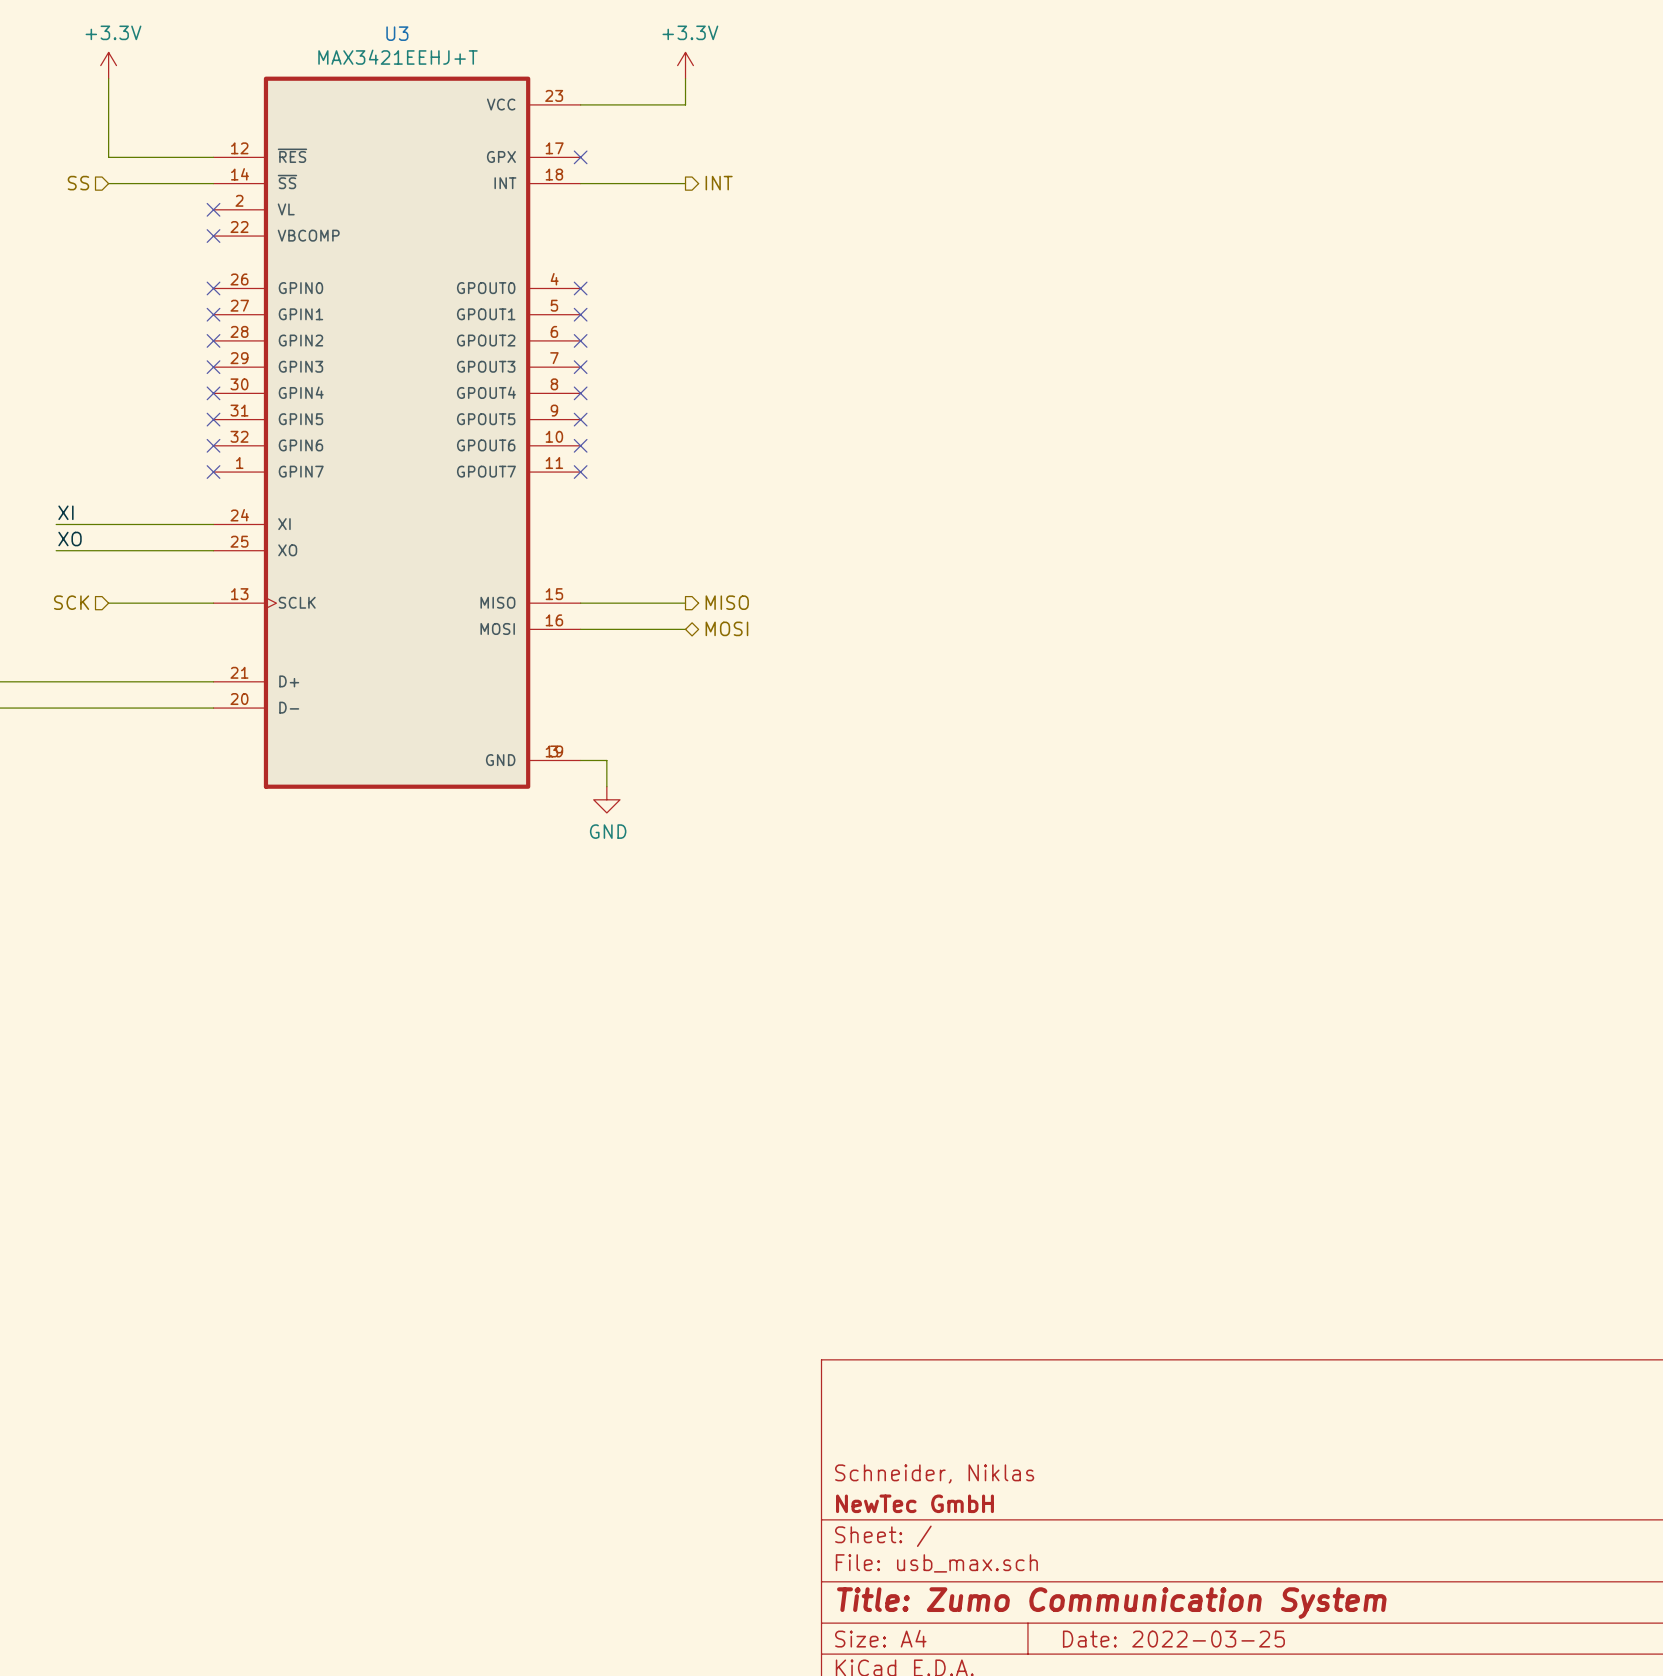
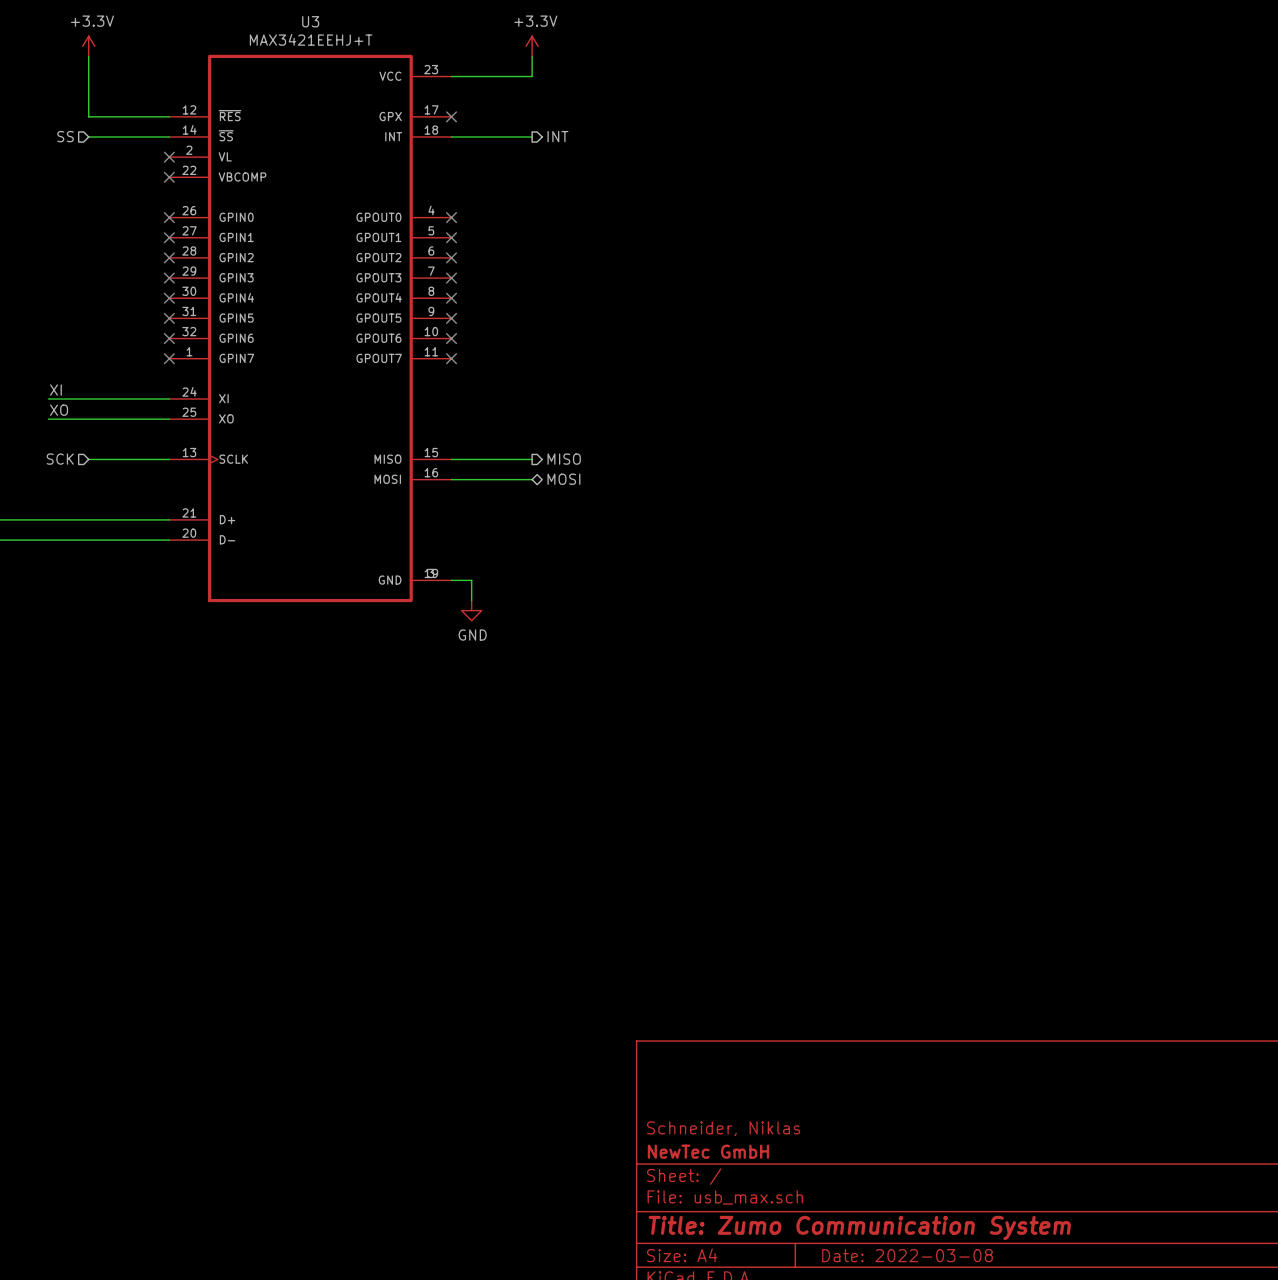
title block: Date: 2022-03-25 (1173, 1639) -> Date: 2022-03-08 (907, 1255)

